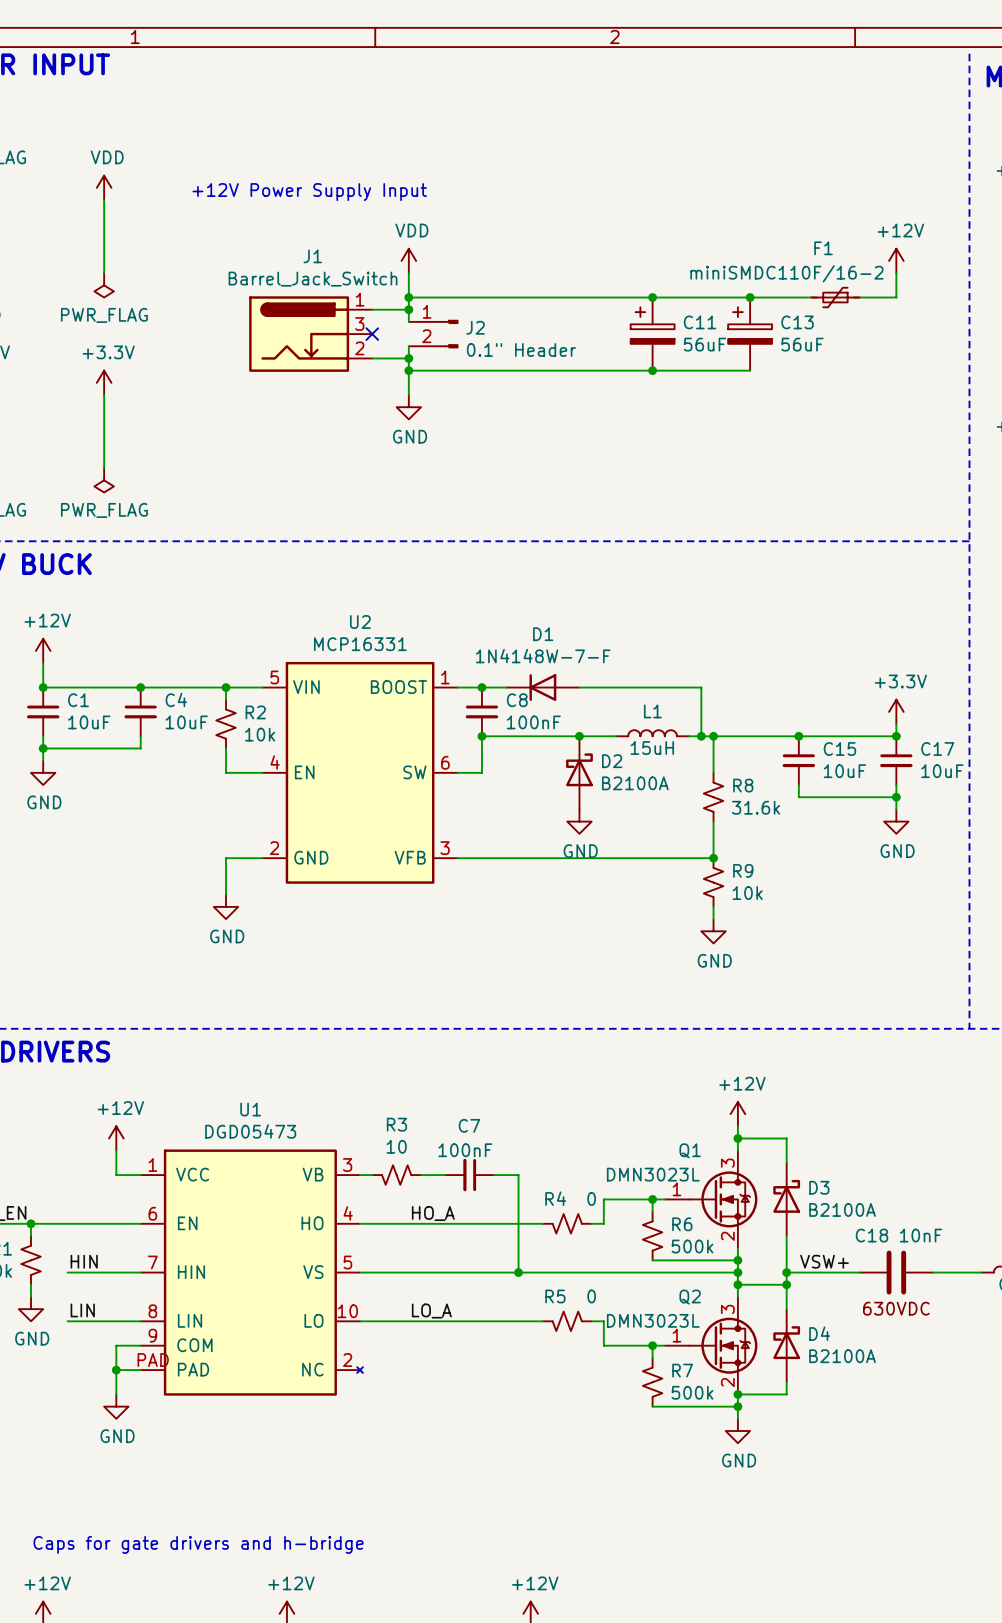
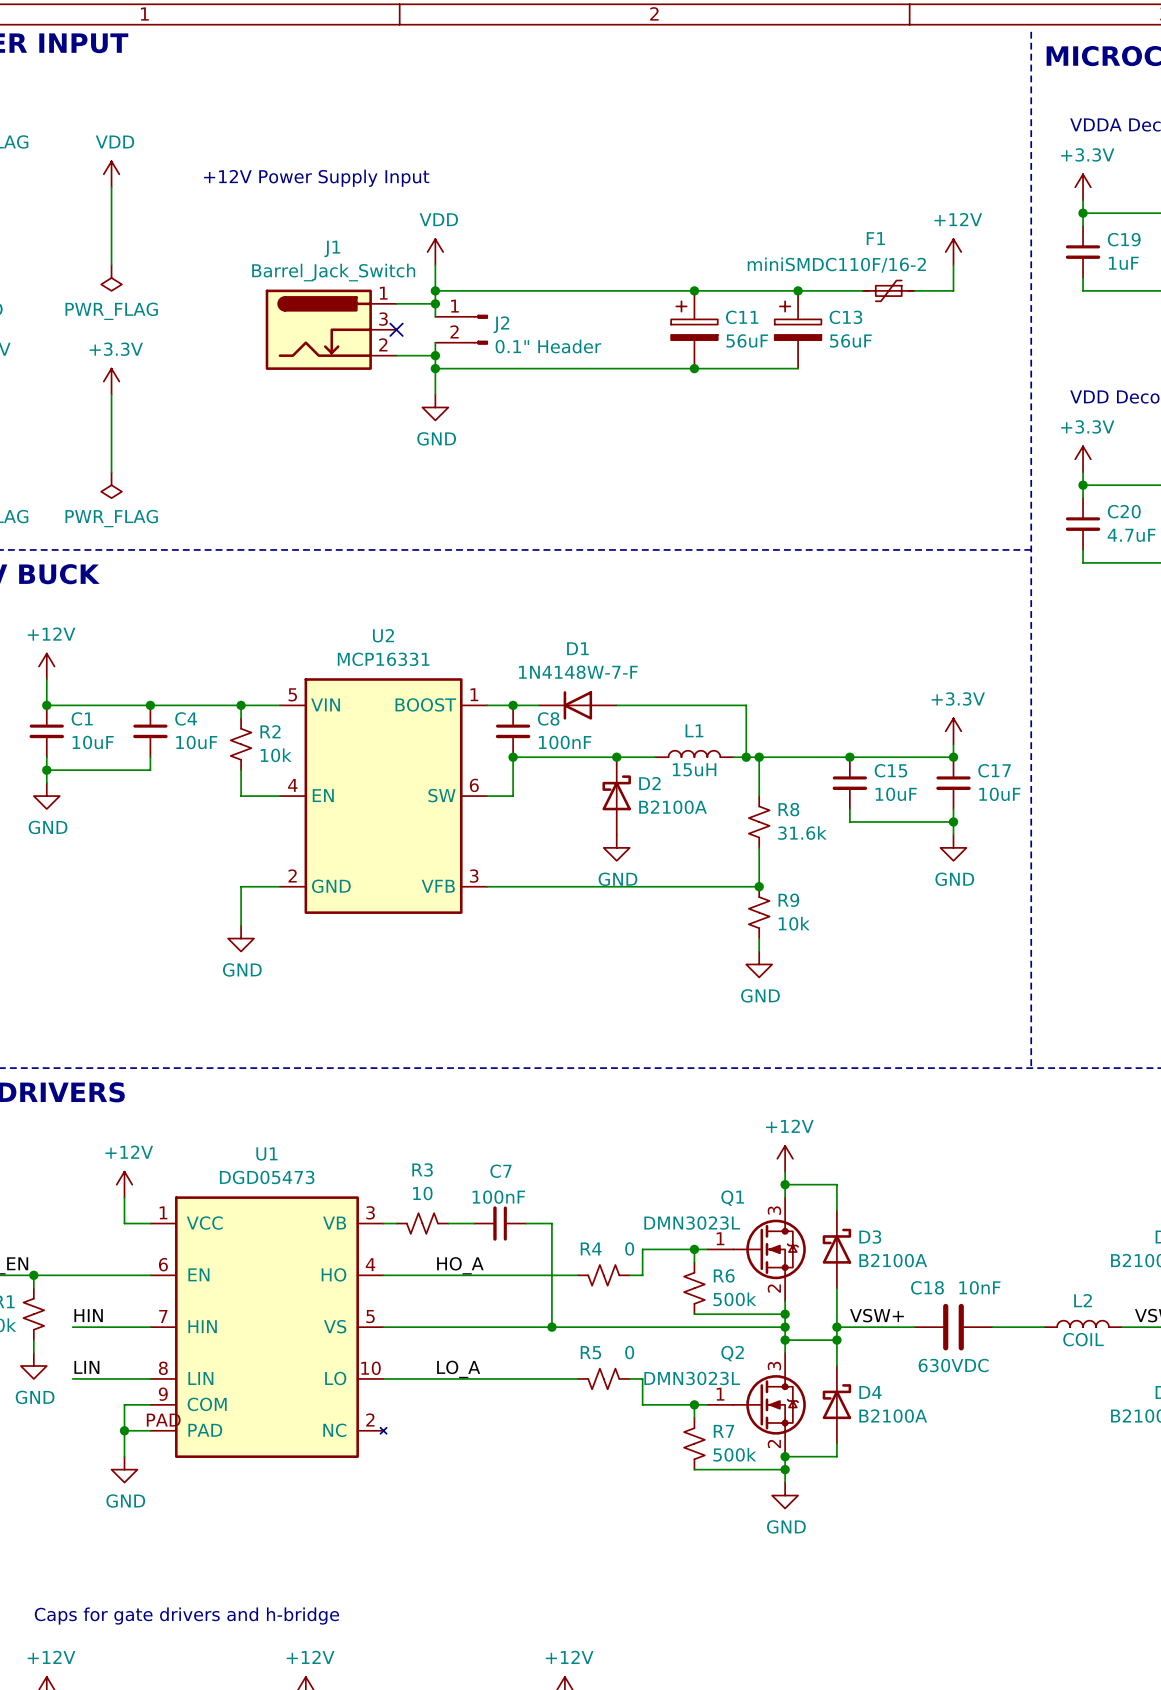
C18 text: 630VDC (896, 1308) -> none
C18 text: none -> 630VDC (953, 1365)

